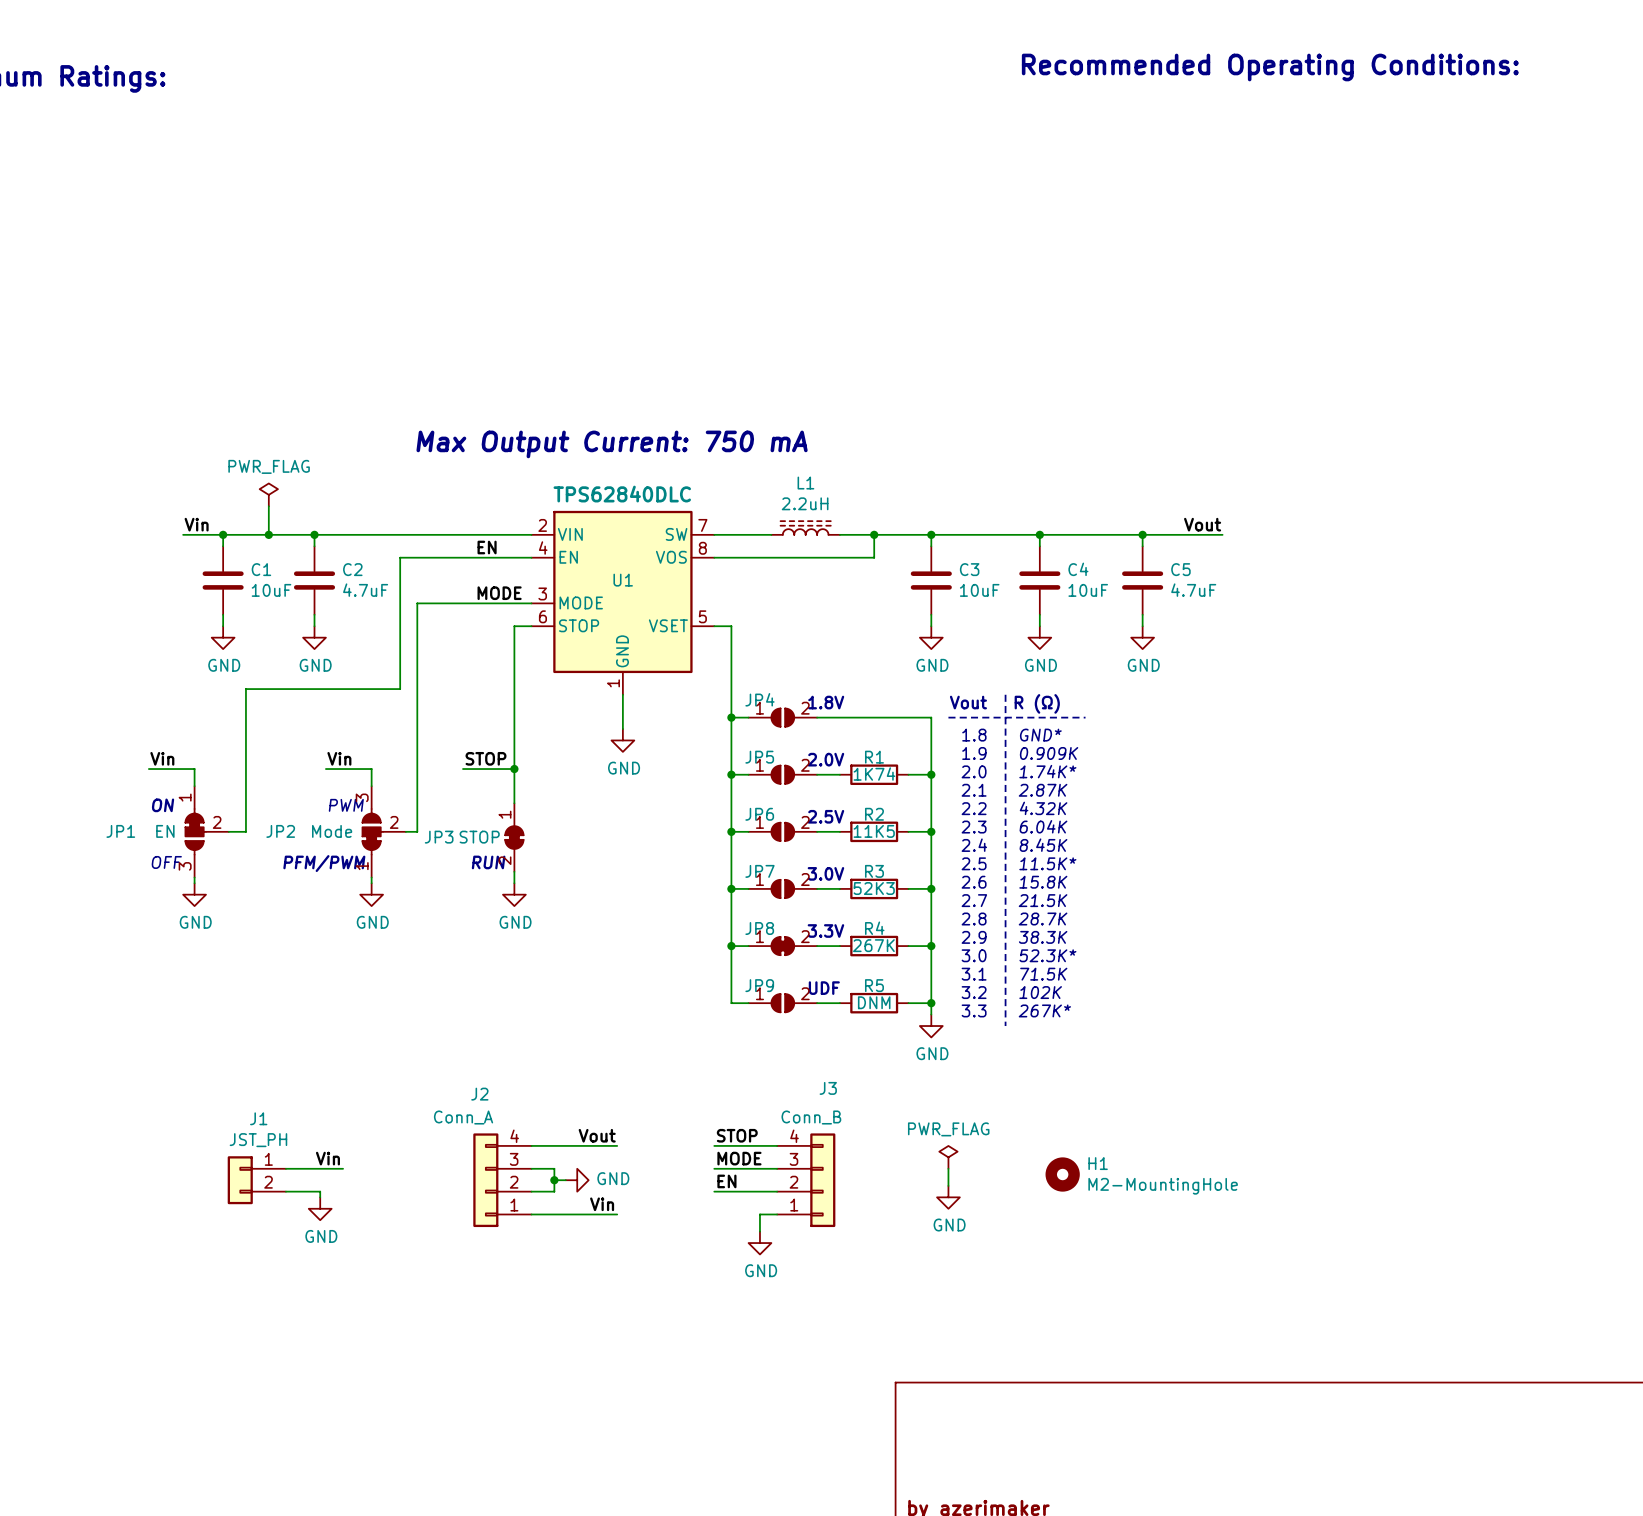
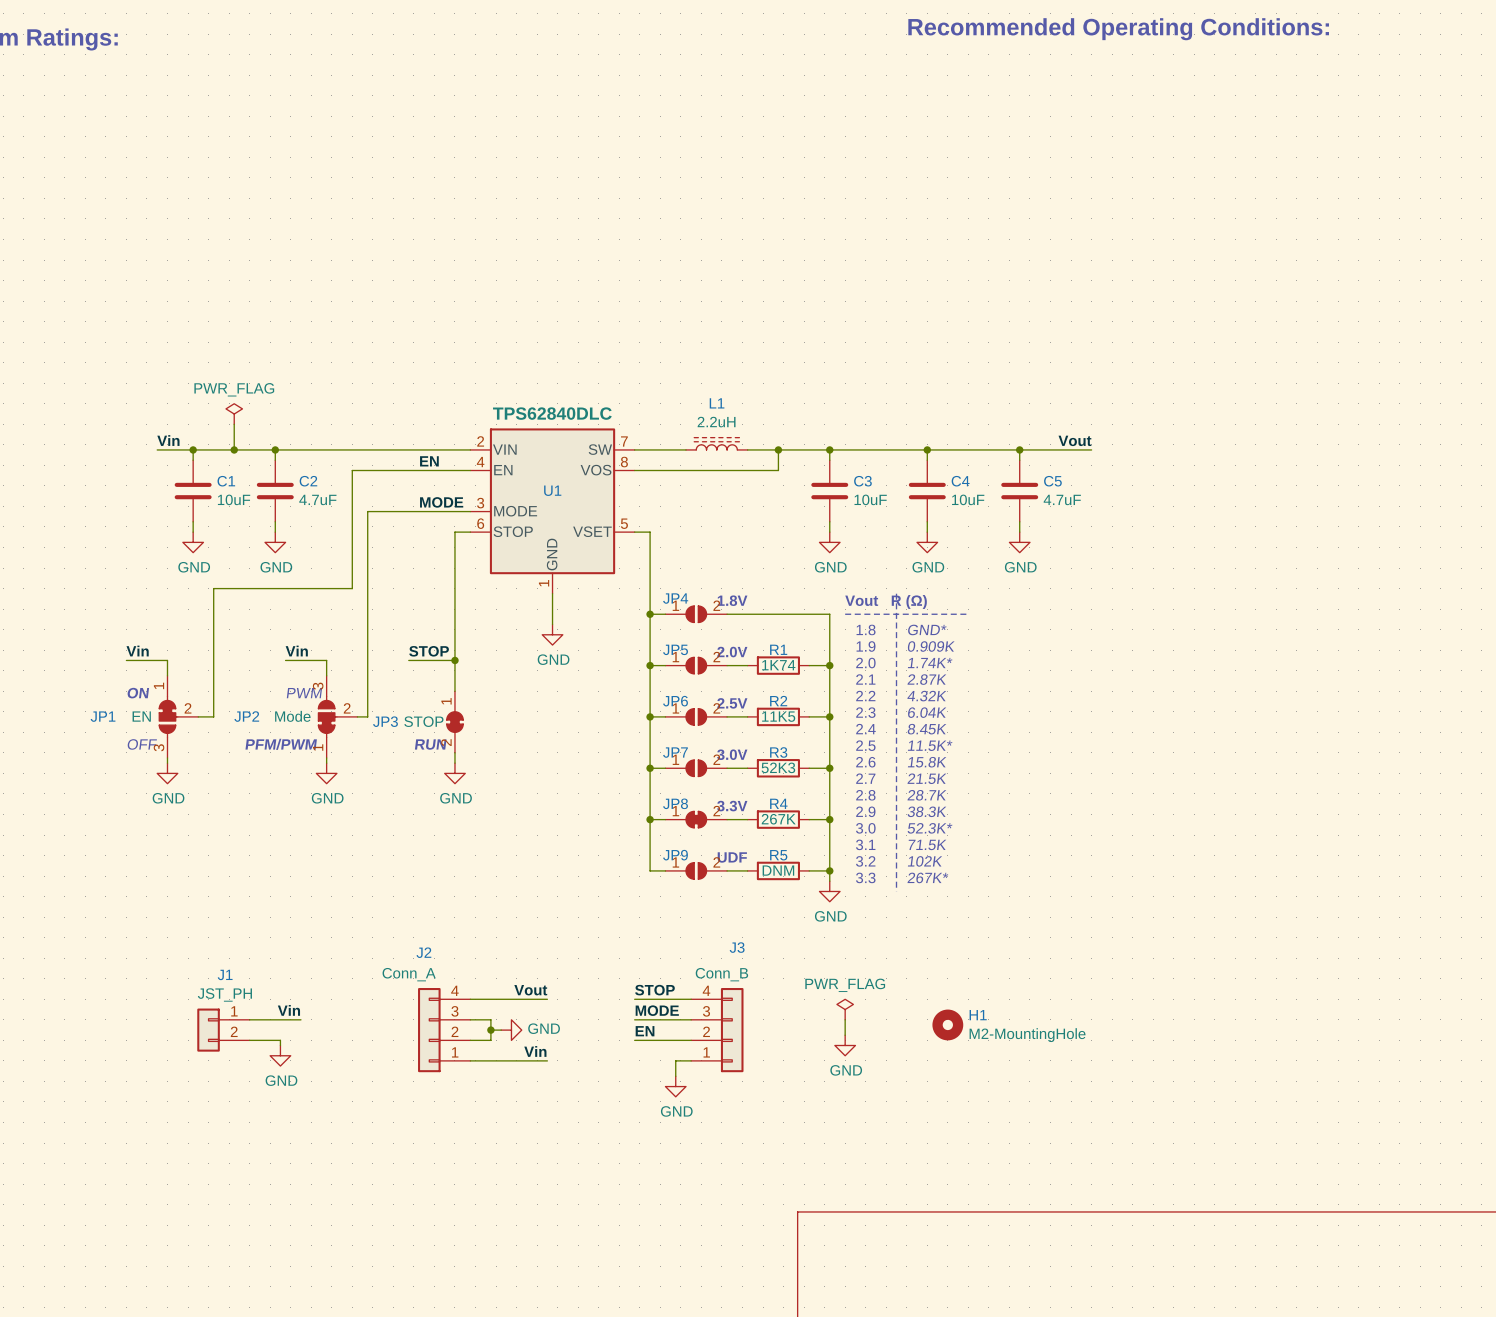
text: Max Output Current: 750 mA (612, 444) -> none

